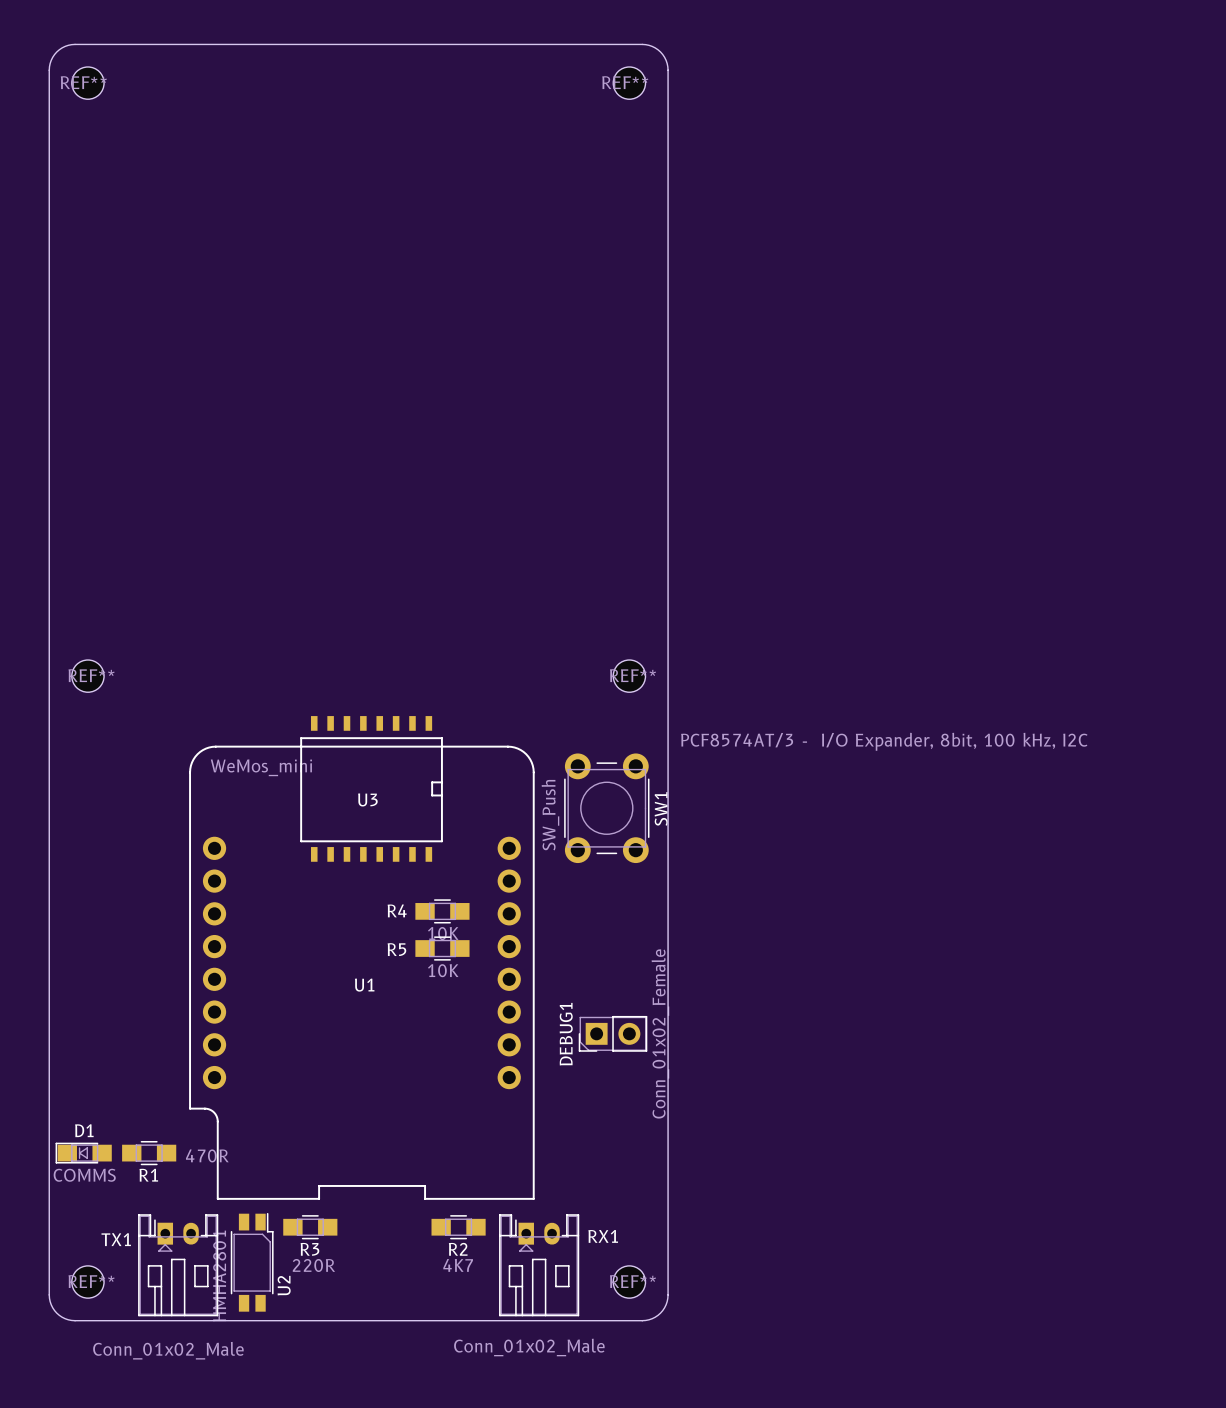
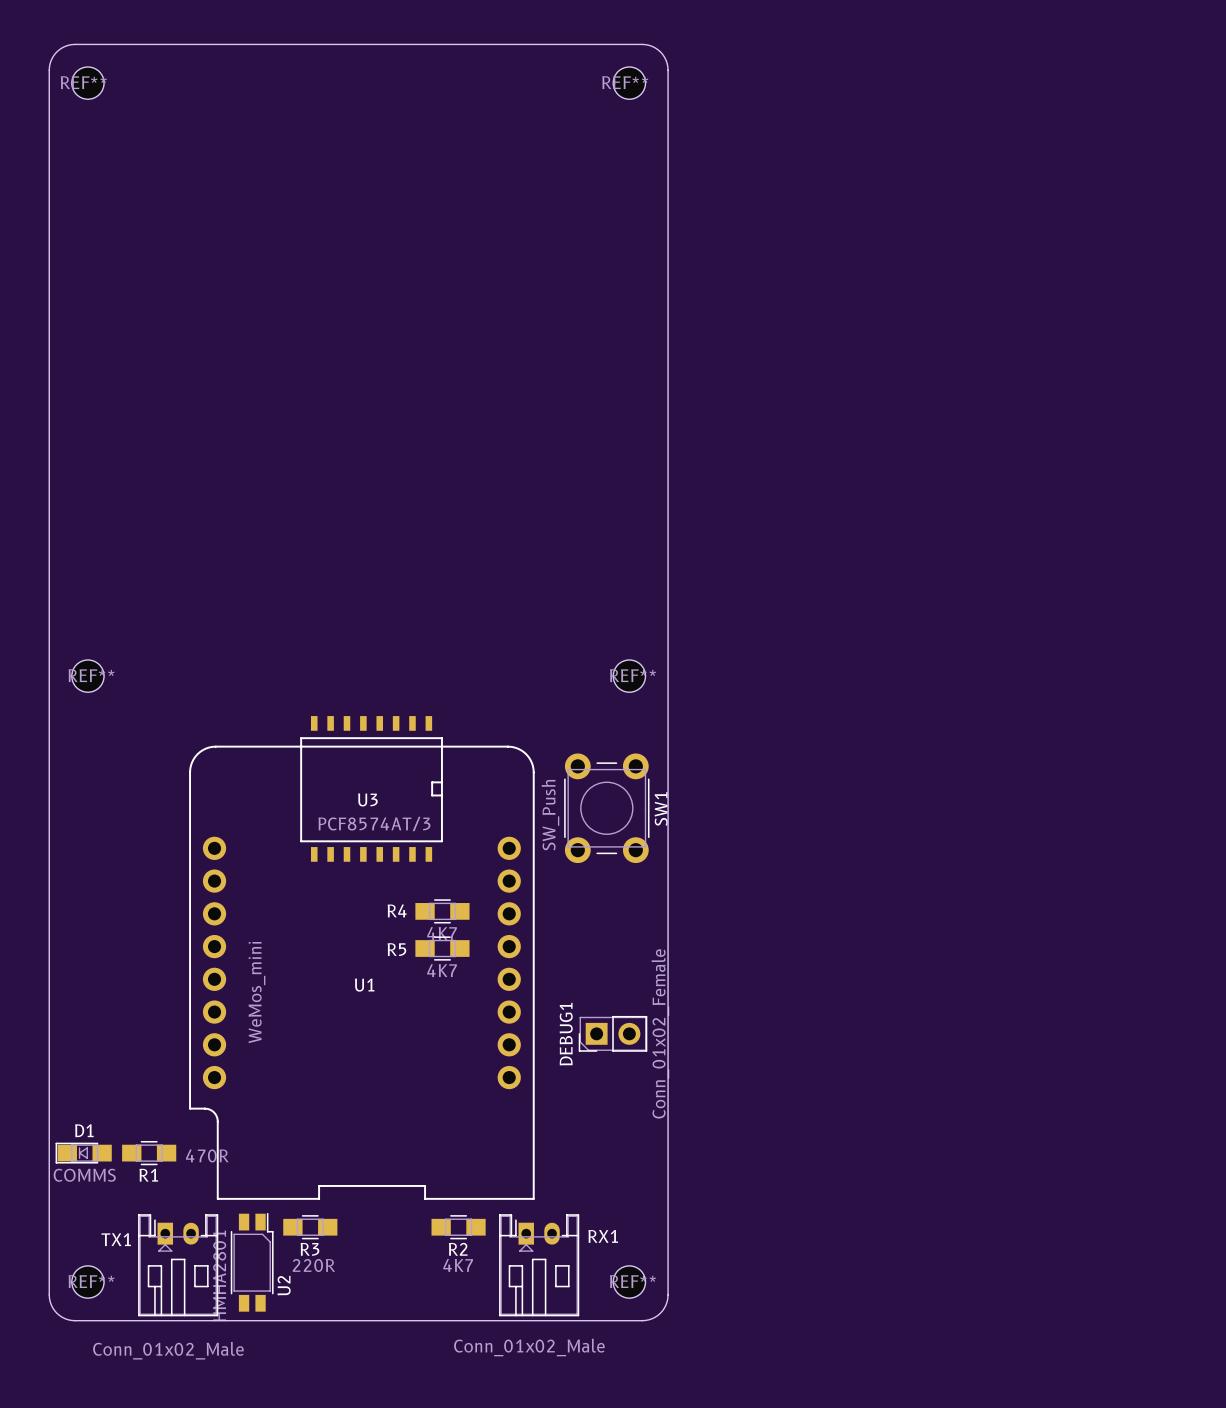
U3 value: PCF8574AT/3 - I/O Expander, 8bit, 100 kHz, I2C (884, 741) -> PCF8574AT/3 (374, 823)
U1 value rotation: 0° (261, 767) -> 90° counterclockwise (256, 992)
U1 value position: WeMos_mini (261, 767) -> WeMos_mini (256, 992)
R4 value: 10K (443, 933) -> 4K7 (442, 933)
R5 value: 10K (443, 970) -> 4K7 (442, 970)

